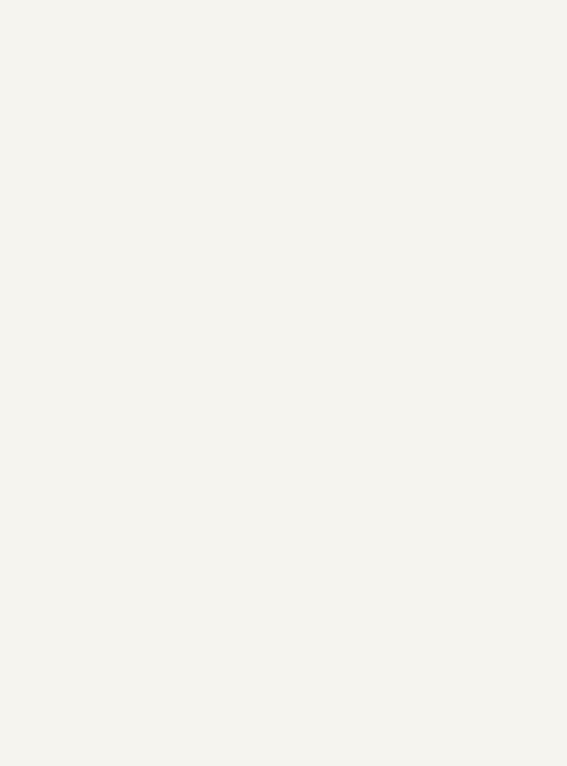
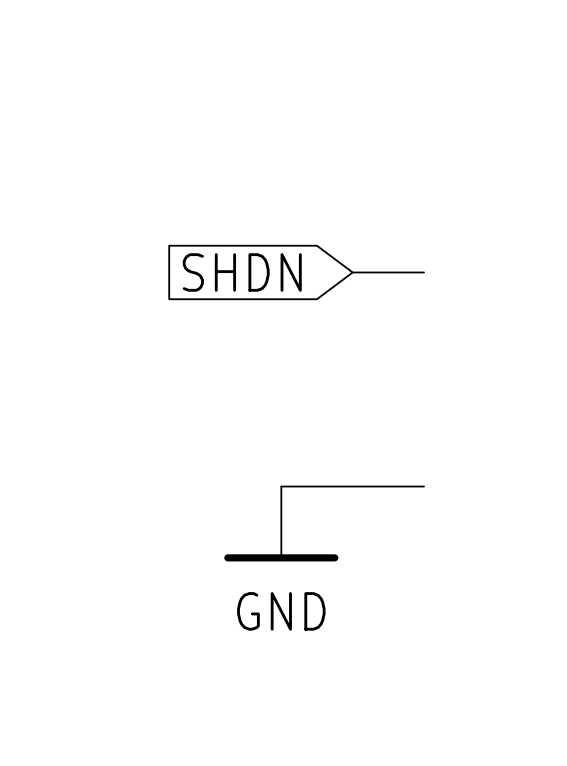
global label: none -> SHDN (242, 272)
wire: none -> (352, 272) (424, 272)
wire: none -> (281, 486) (424, 486)
power symbol: none -> GND (281, 523)

